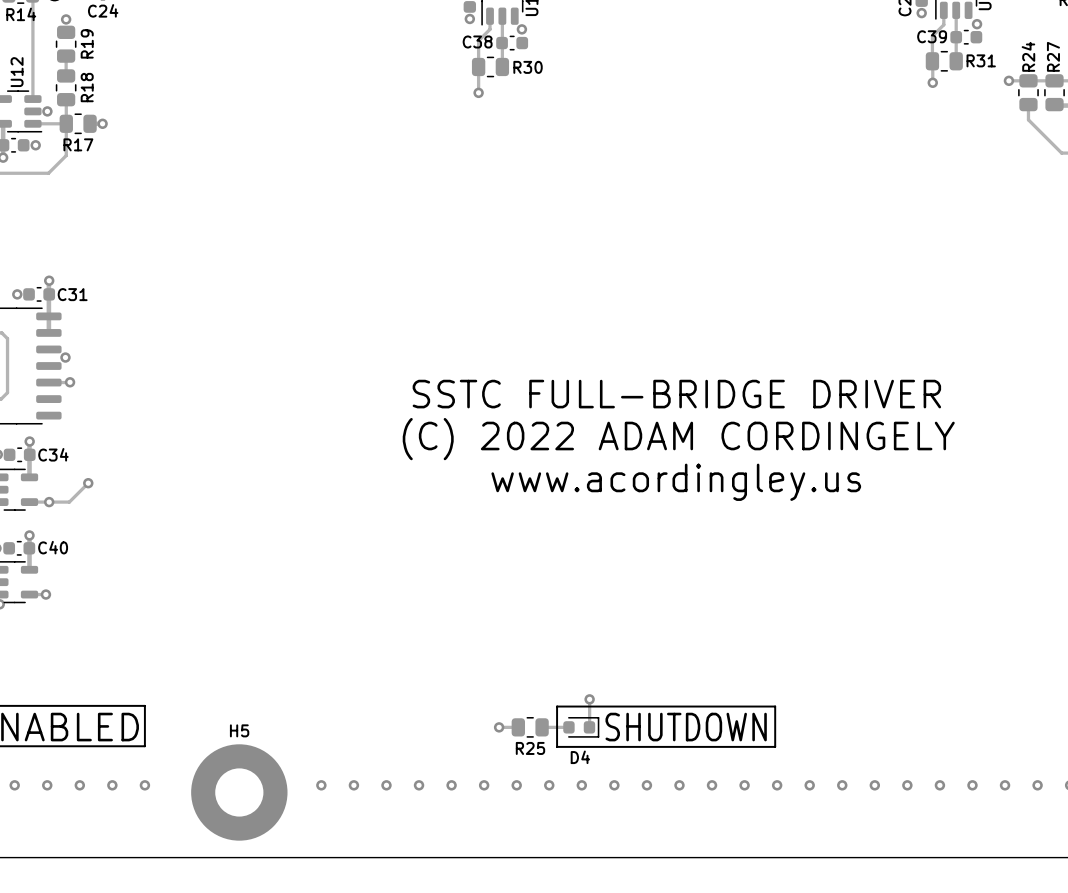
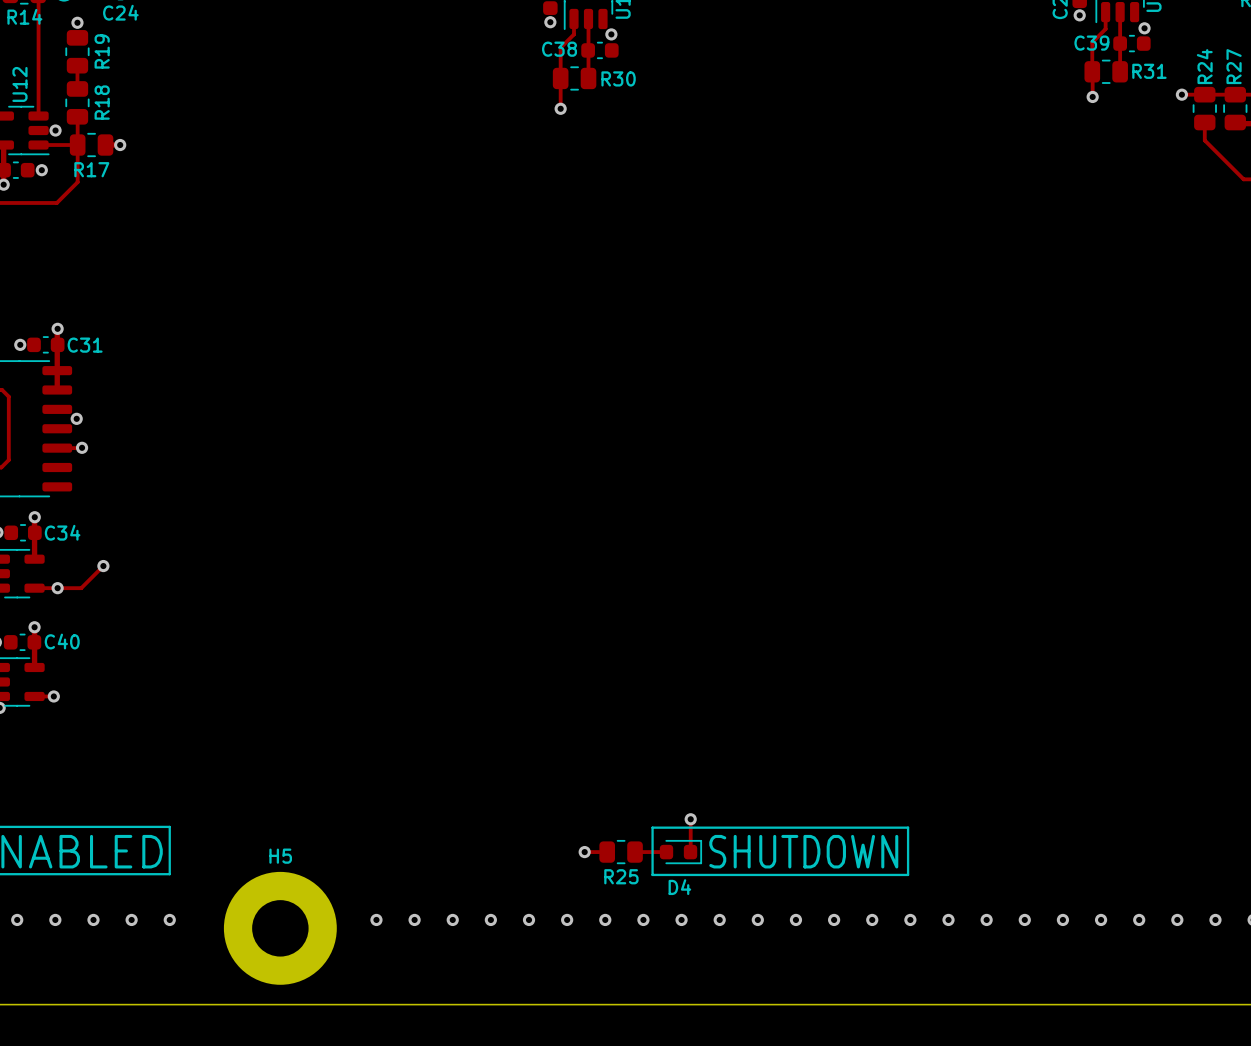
text: SSTC FULL-BRIDGE DRIVER (676, 394) -> none
text: (C) 2022 ADAM CORDINGELY (678, 439) -> none
text: www.acordingley.us (676, 482) -> none

